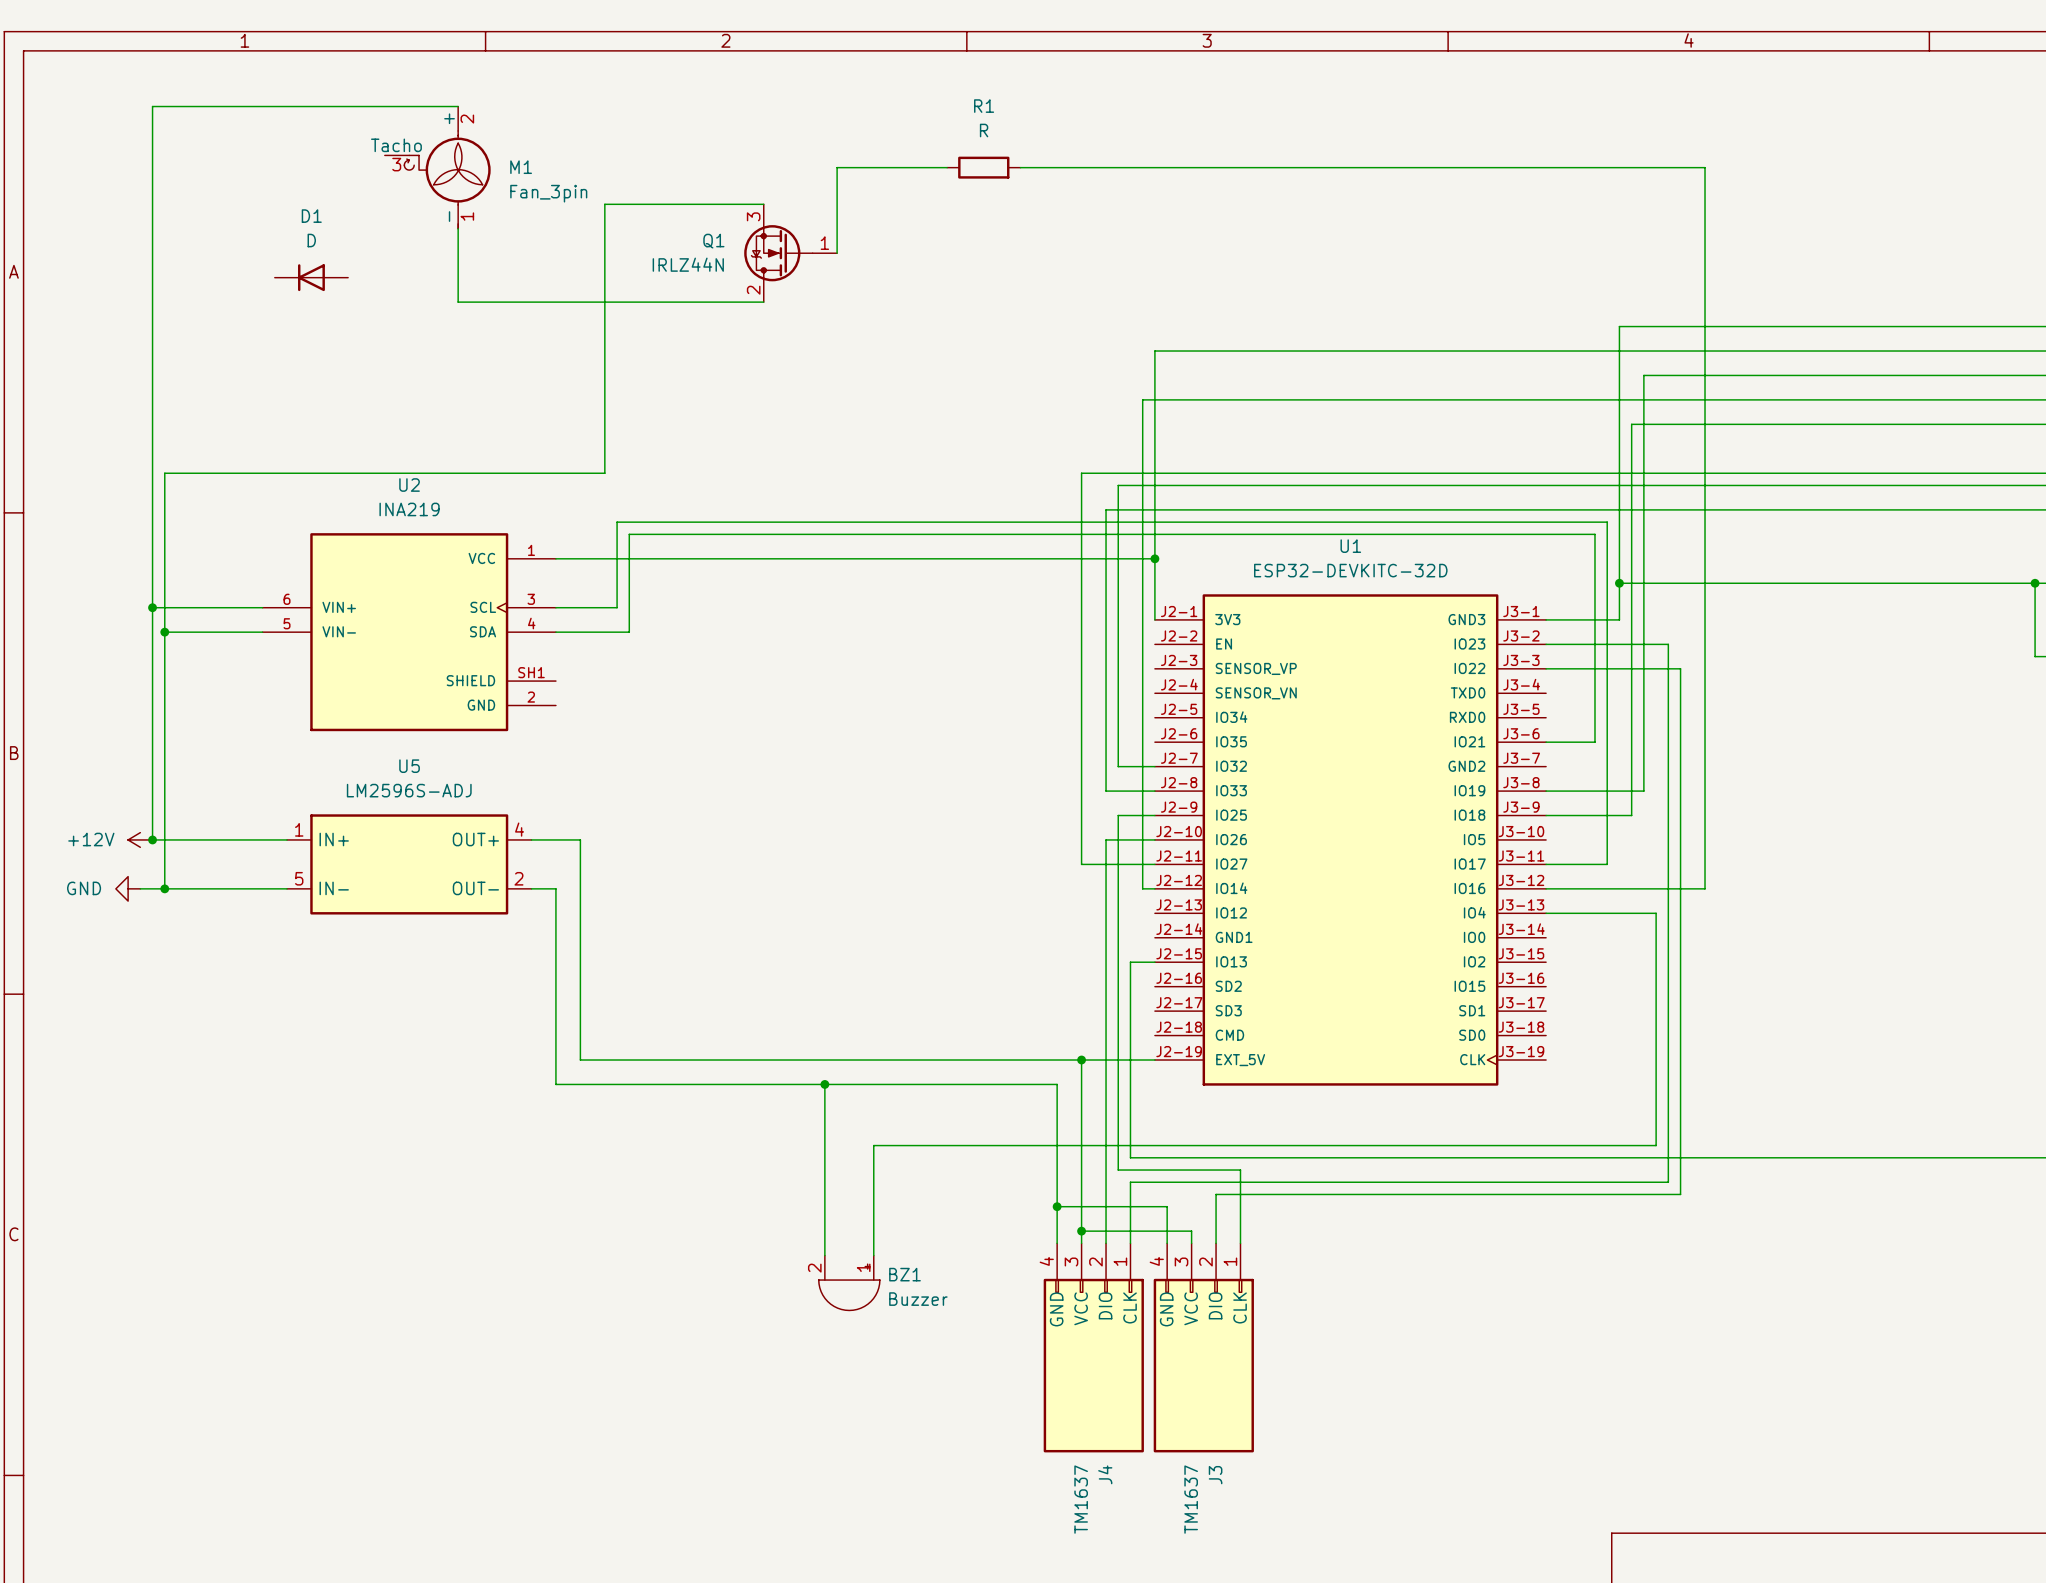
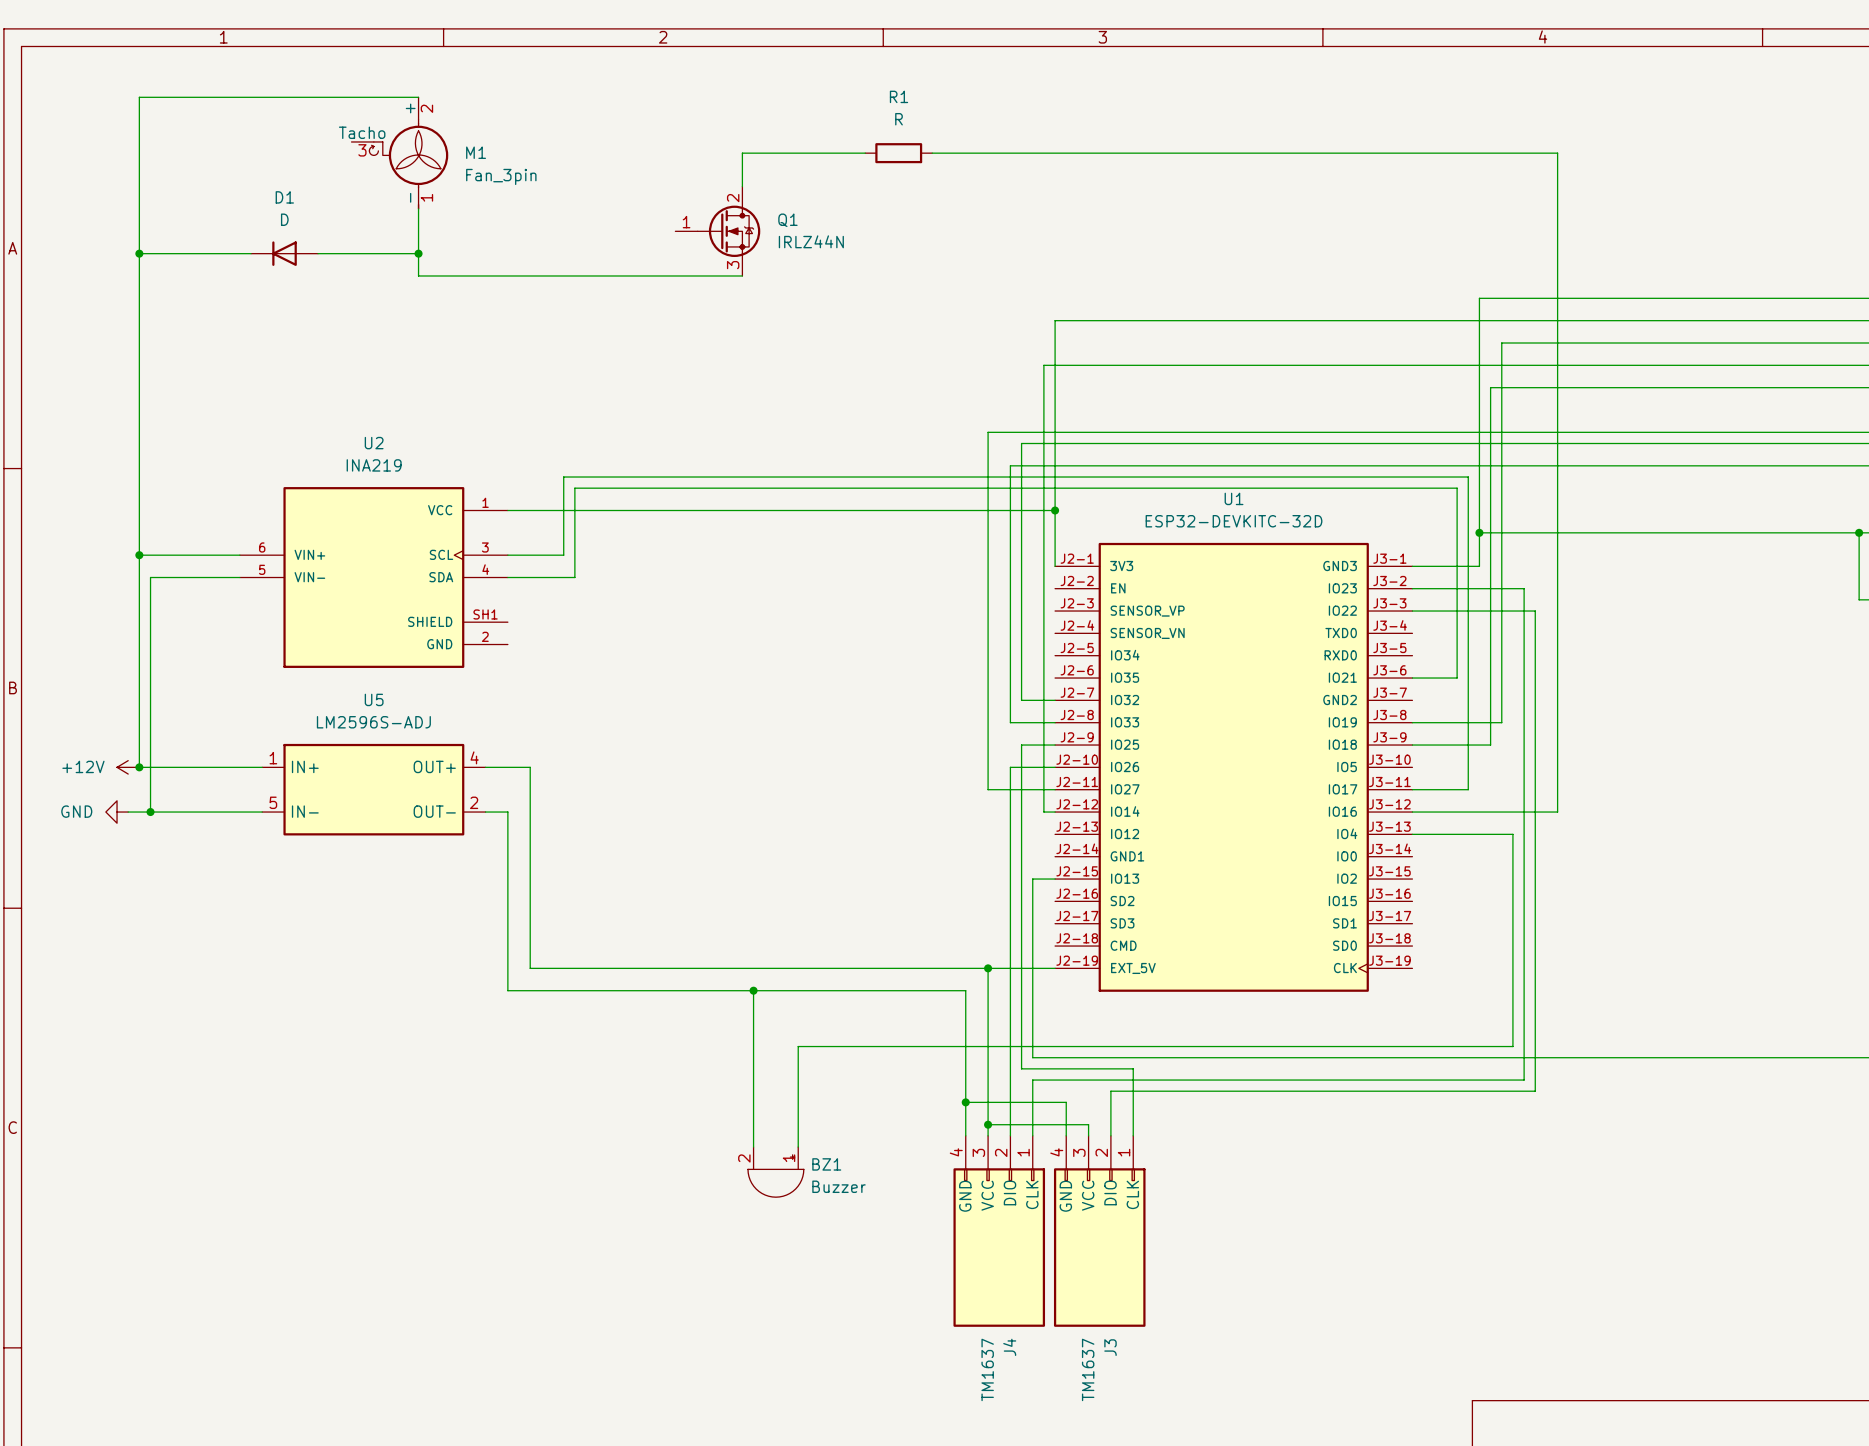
wire: (837, 167) (837, 253) -> (764, 153) (742, 153) (742, 186)
wire: (763, 204) (604, 204) (604, 473) (164, 473) (164, 632) -> none
Q1 name position: Q1 (713, 241) -> Q1 (787, 220)
Q1 rotation: 0° (778, 253) -> 180° (728, 231)
Q1 value position: IRLZ44N (688, 264) -> IRLZ44N (811, 241)
wire: none -> (139, 253) (251, 253)
junction: none -> (139, 253)
wire: none -> (318, 253) (418, 253)
junction: none -> (418, 253)
wire: none -> (697, 275) (742, 275)
junction: (164, 632) -> none

